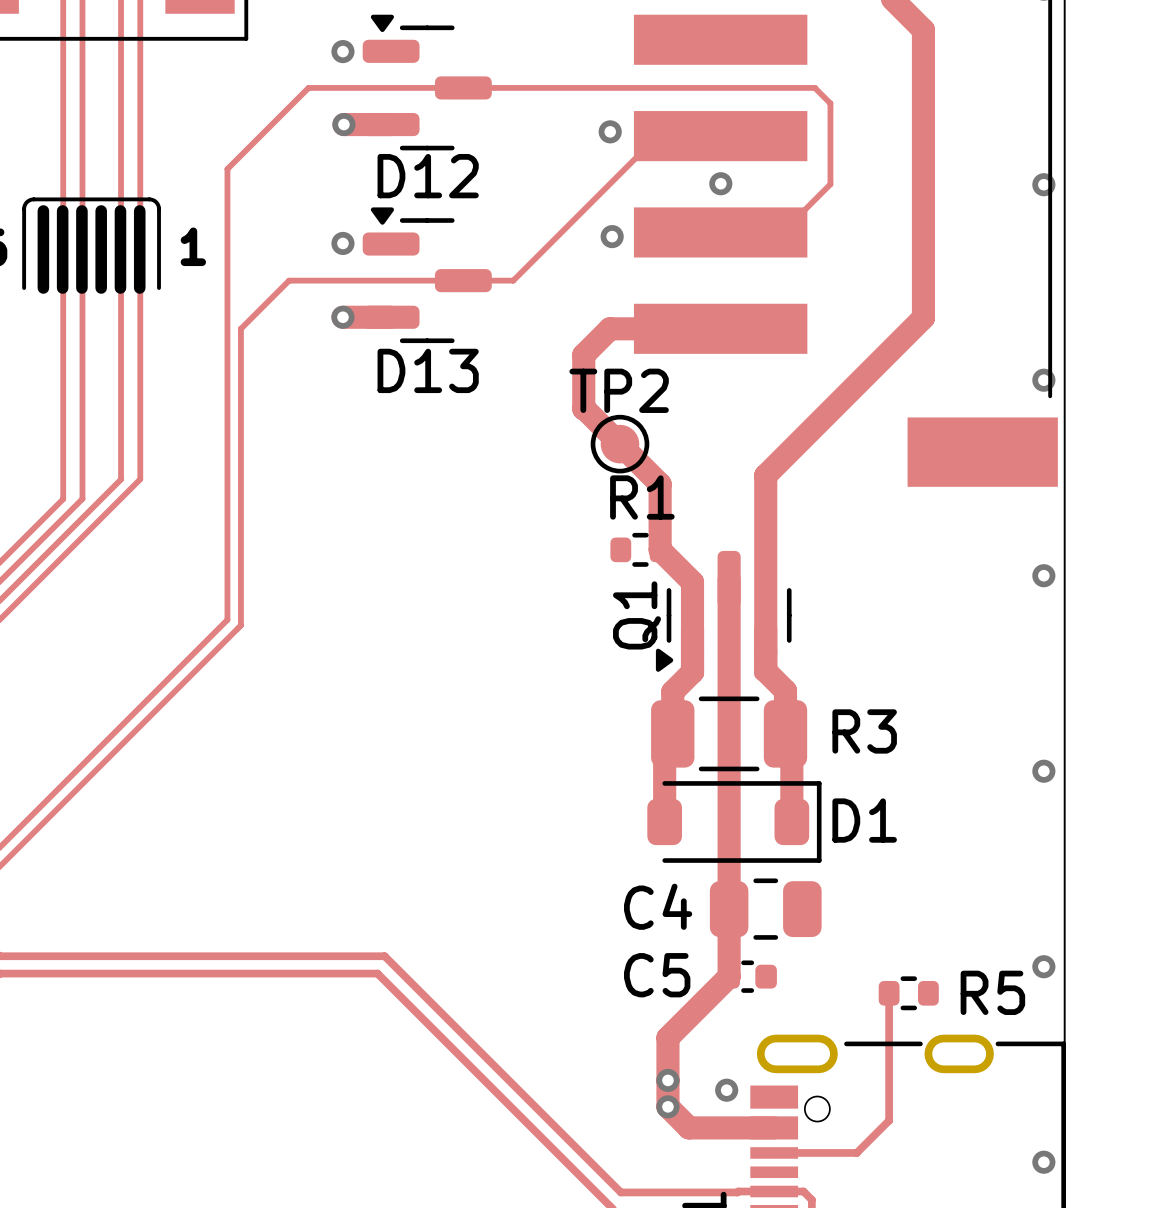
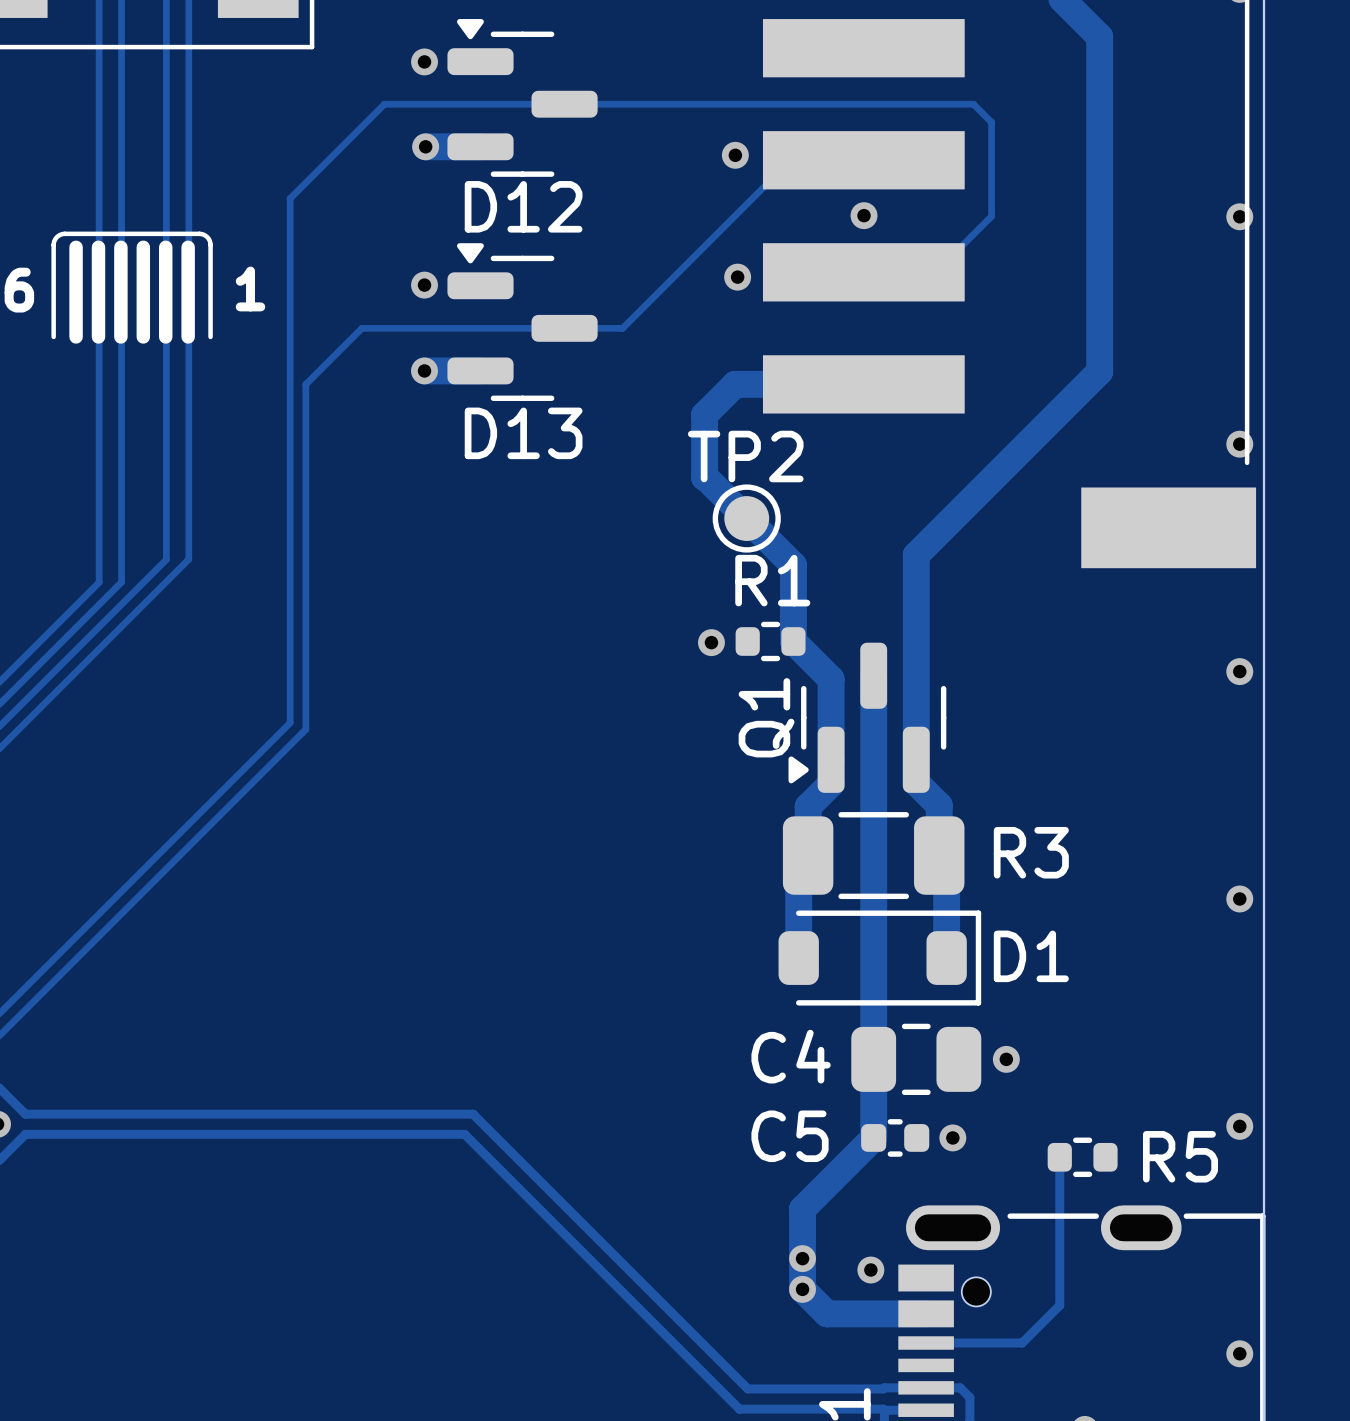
via: none -> (711, 642)
via: none -> (1006, 1059)
via: none -> (952, 1137)

